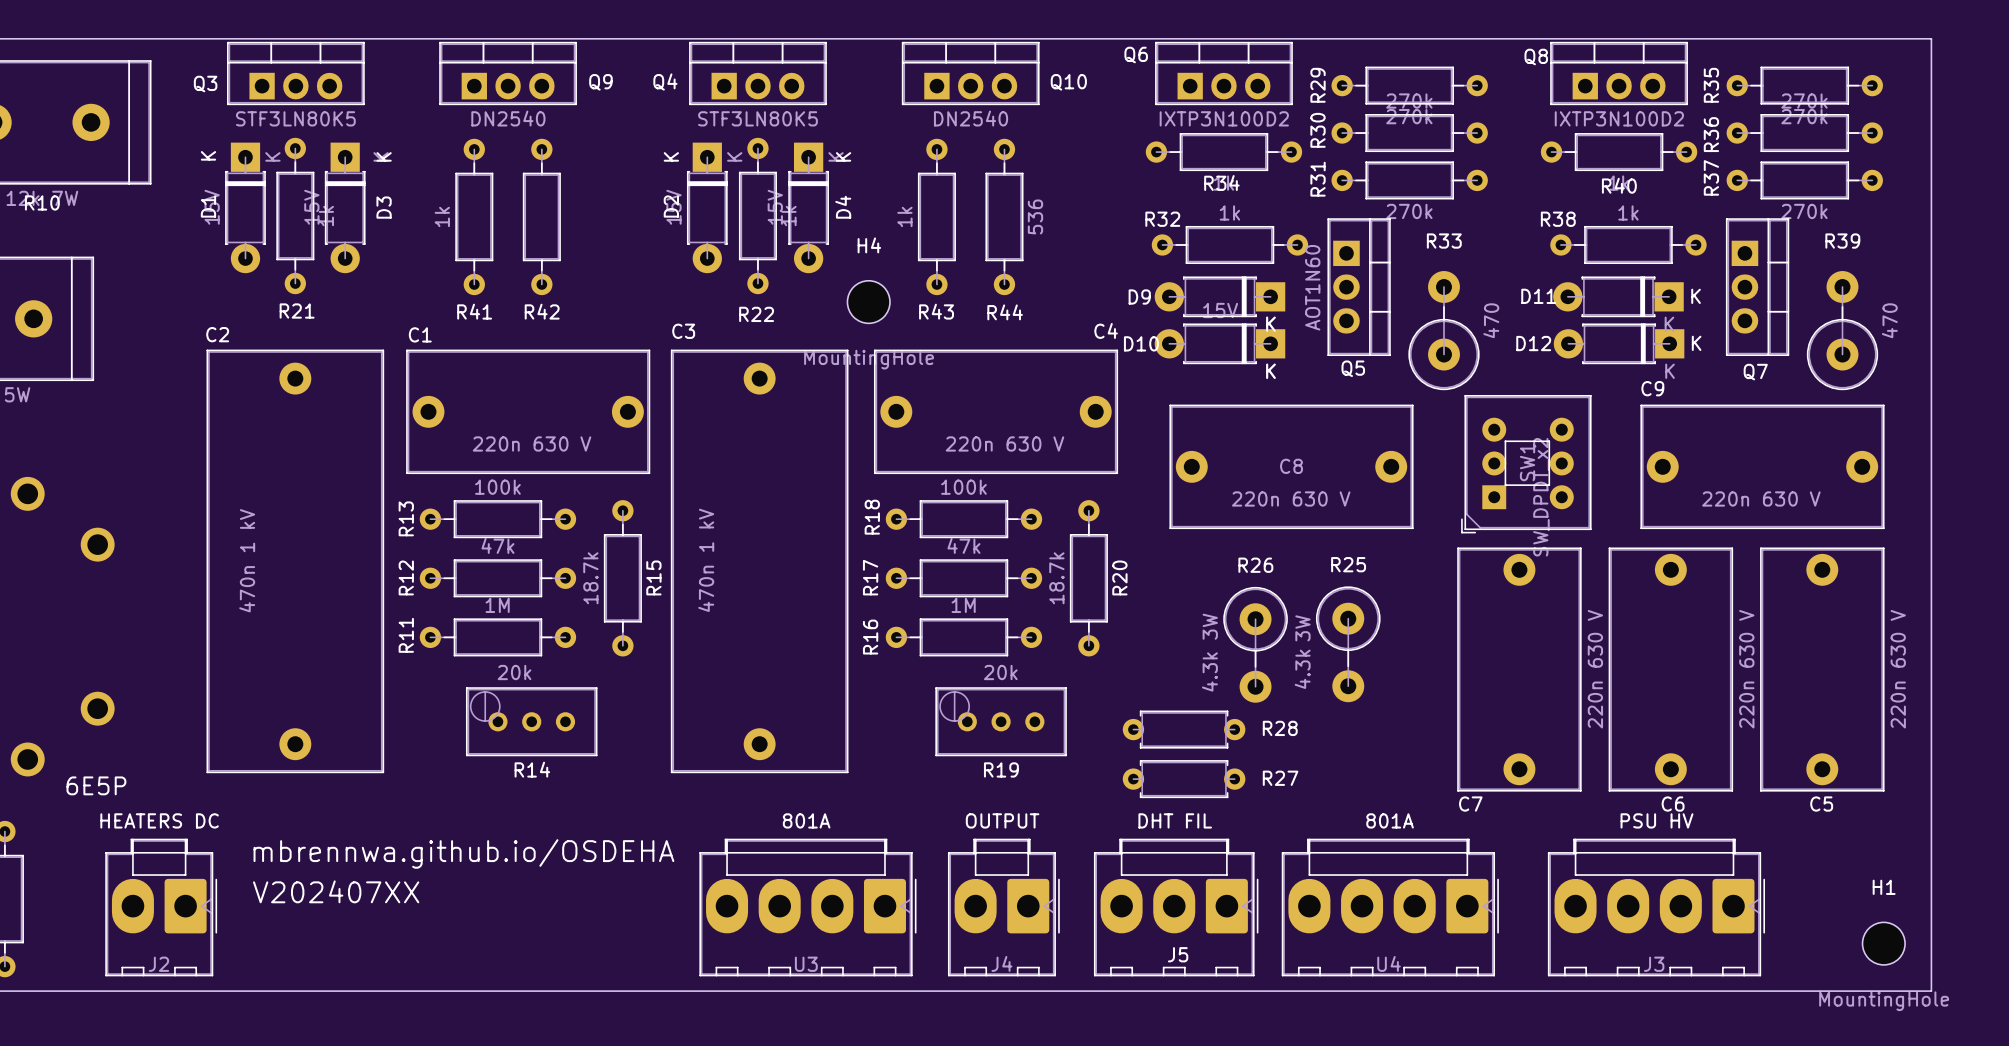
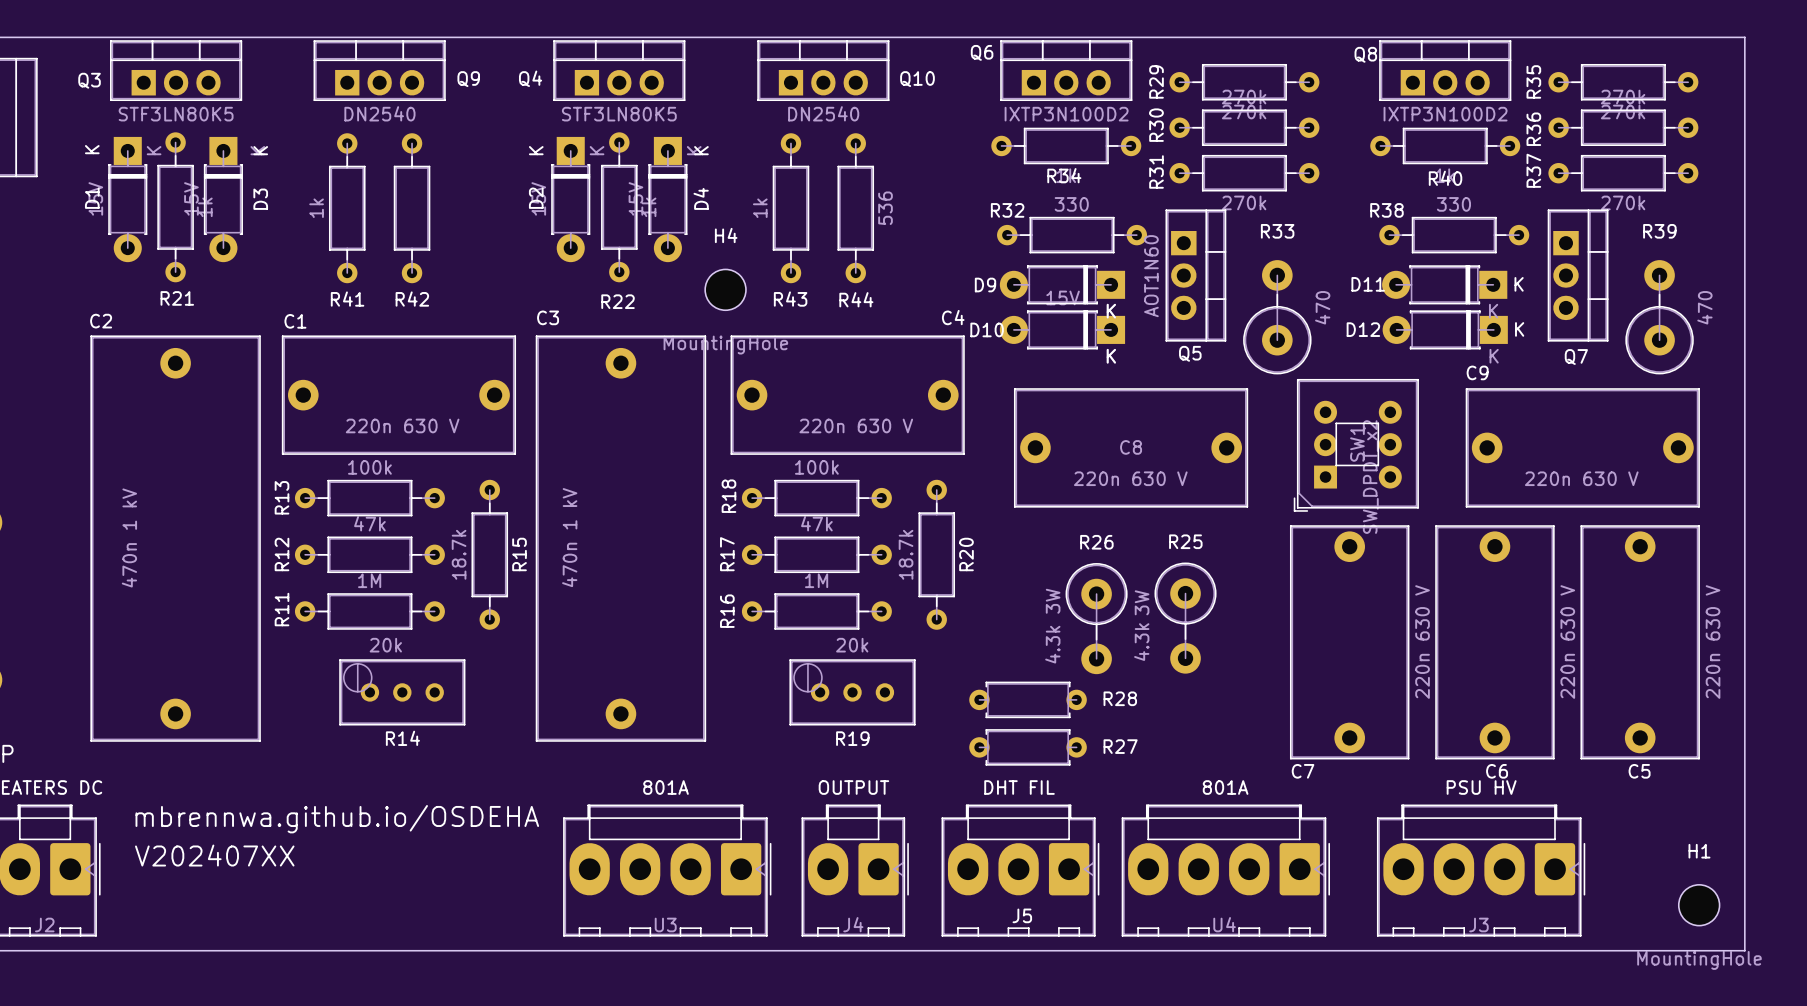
R32 value: 1k (1229, 212) -> 330 (1071, 204)
R38 value: 1k (1628, 212) -> 330 (1453, 204)

